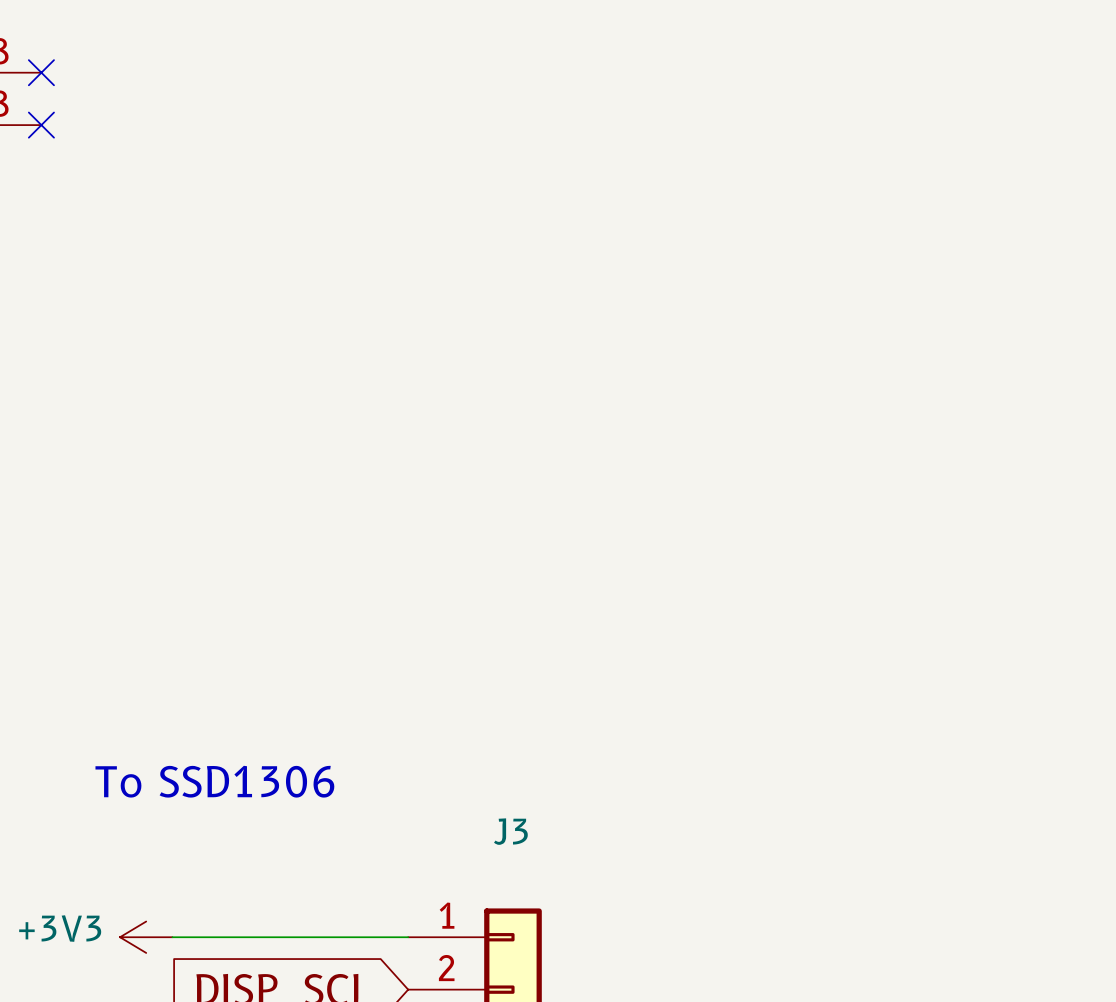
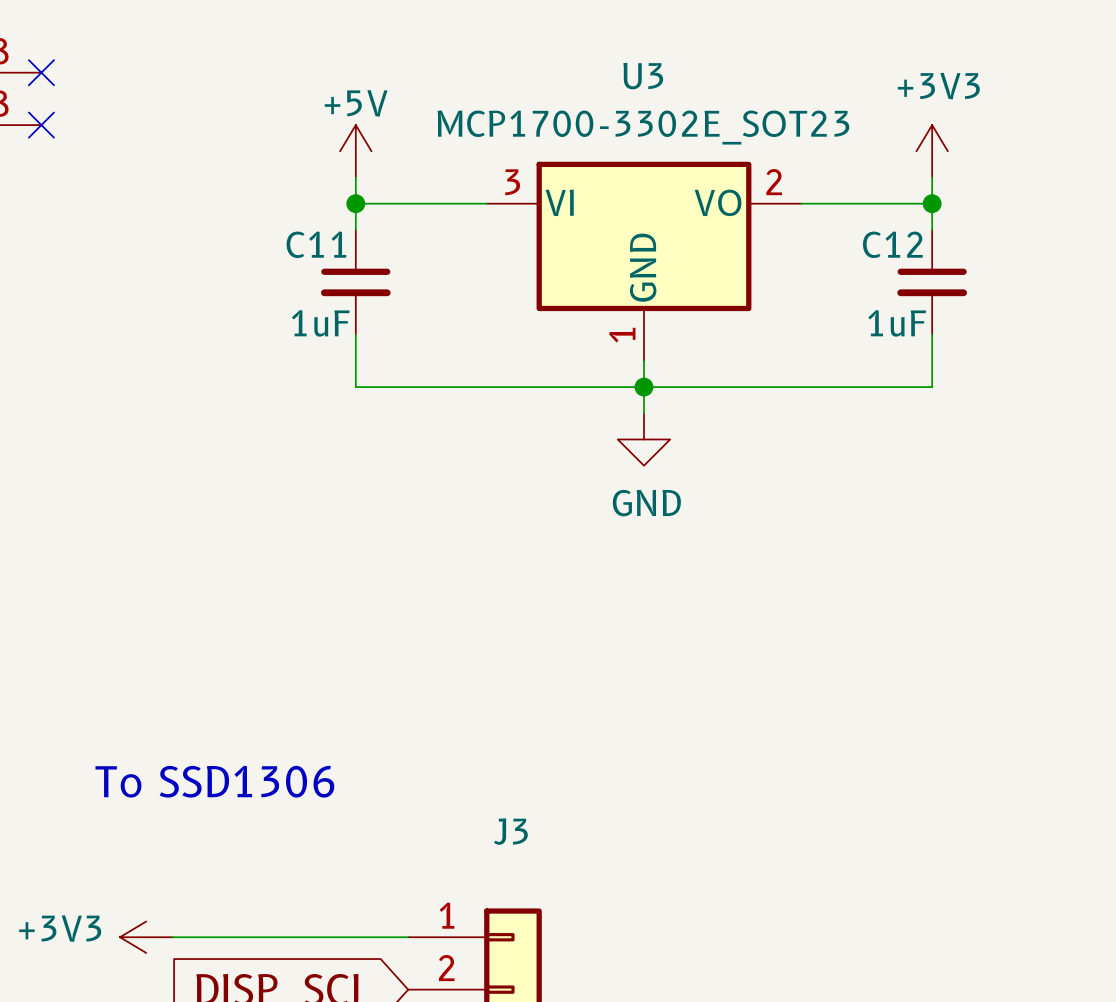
power symbol: none -> +5V (355, 151)
power symbol: none -> +3V3 (932, 151)
wire: none -> (355, 177) (355, 229)
wire: none -> (932, 177) (932, 229)
wire: none -> (355, 203) (486, 203)
junction: none -> (355, 203)
wire: none -> (801, 203) (932, 203)
junction: none -> (932, 203)
U3: none -> MCP1700-3302E_SOT23 (643, 261)
C11: none -> 1uF (355, 282)
C12: none -> 1uF (932, 282)
wire: none -> (355, 334) (355, 387) (932, 387) (932, 334)
wire: none -> (643, 360) (643, 413)
junction: none -> (643, 387)
power symbol: none -> GND (643, 439)

